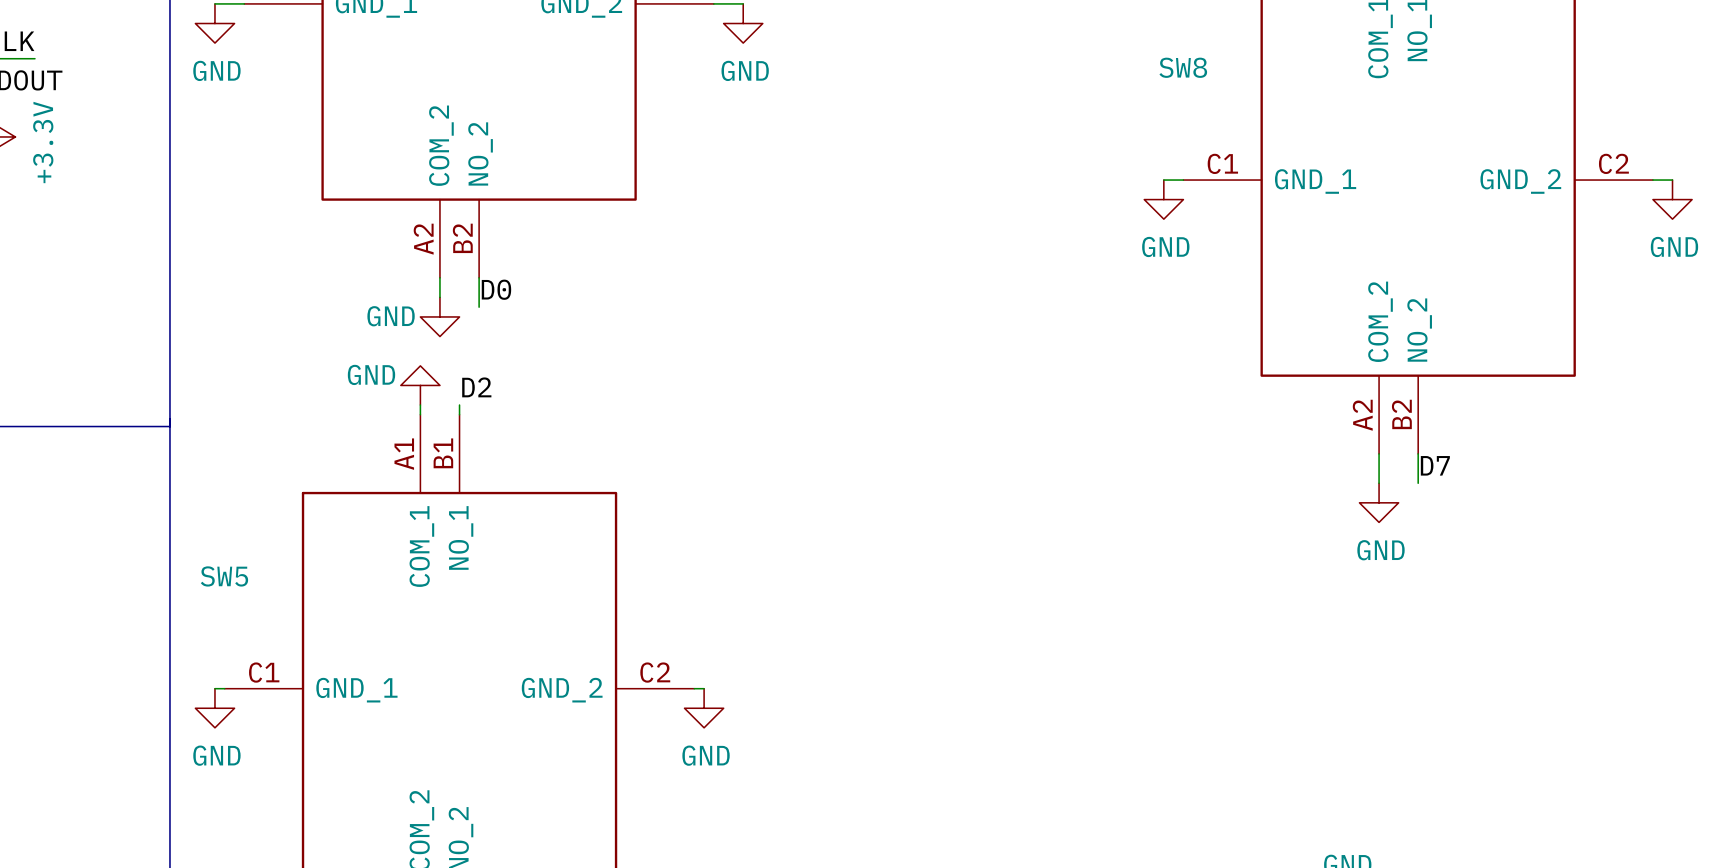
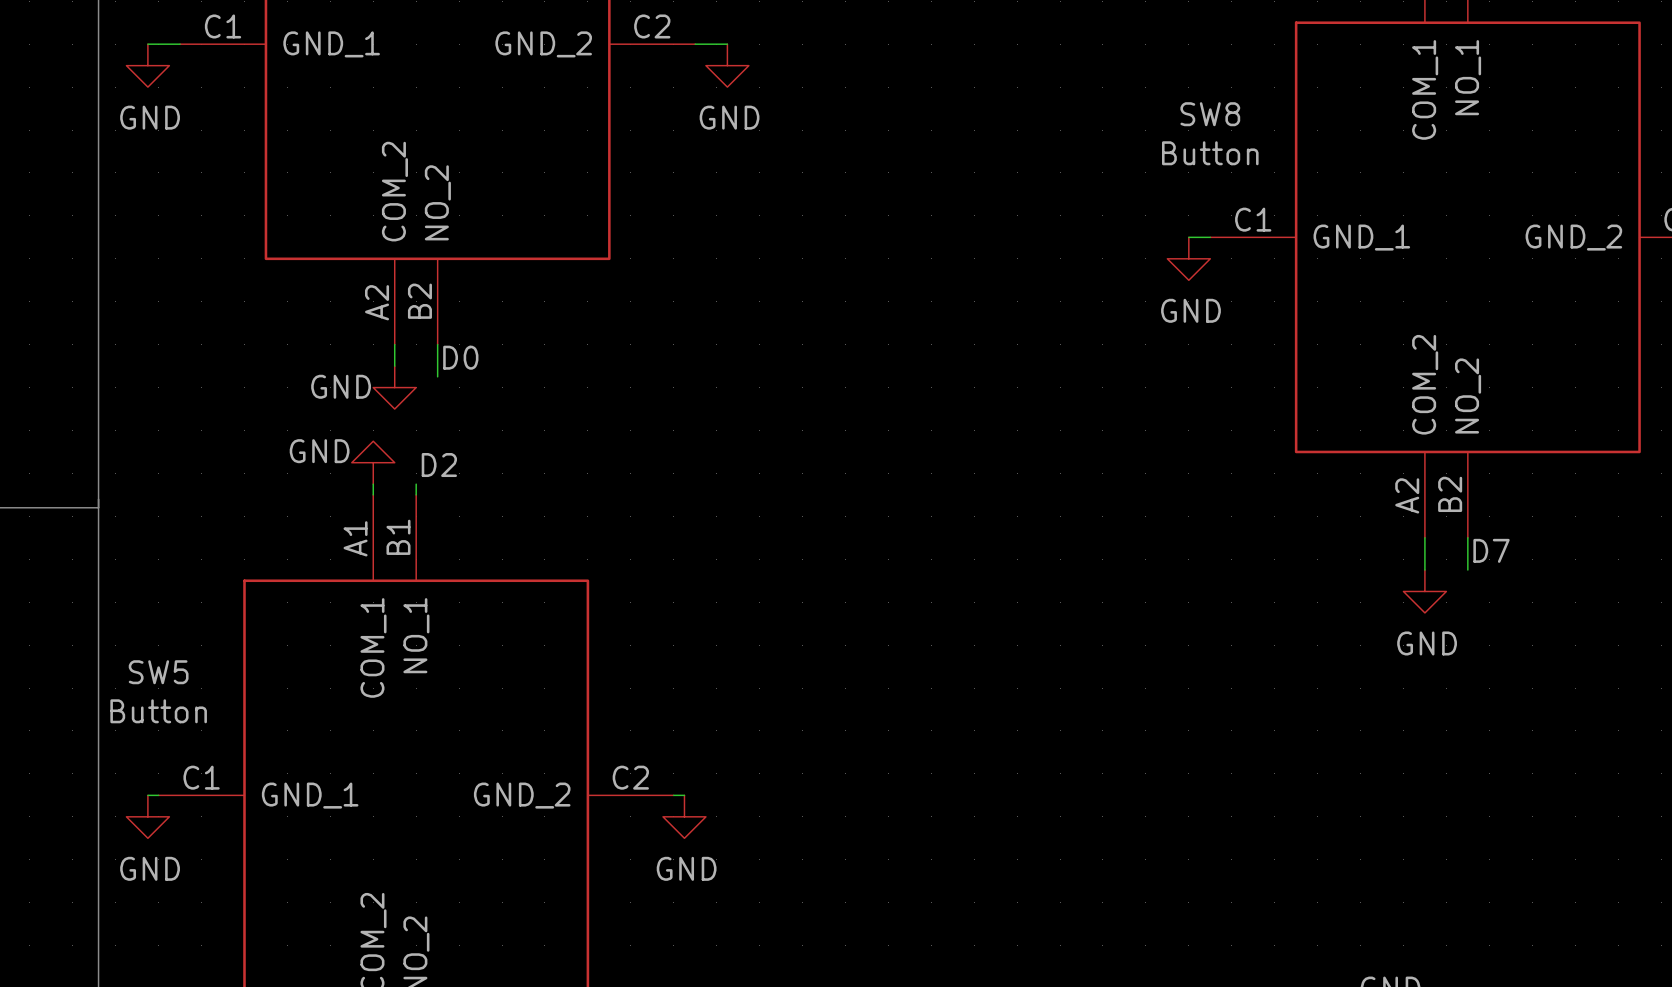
SW8 value: none -> Button (1210, 153)
SW5 value: none -> Button (158, 711)

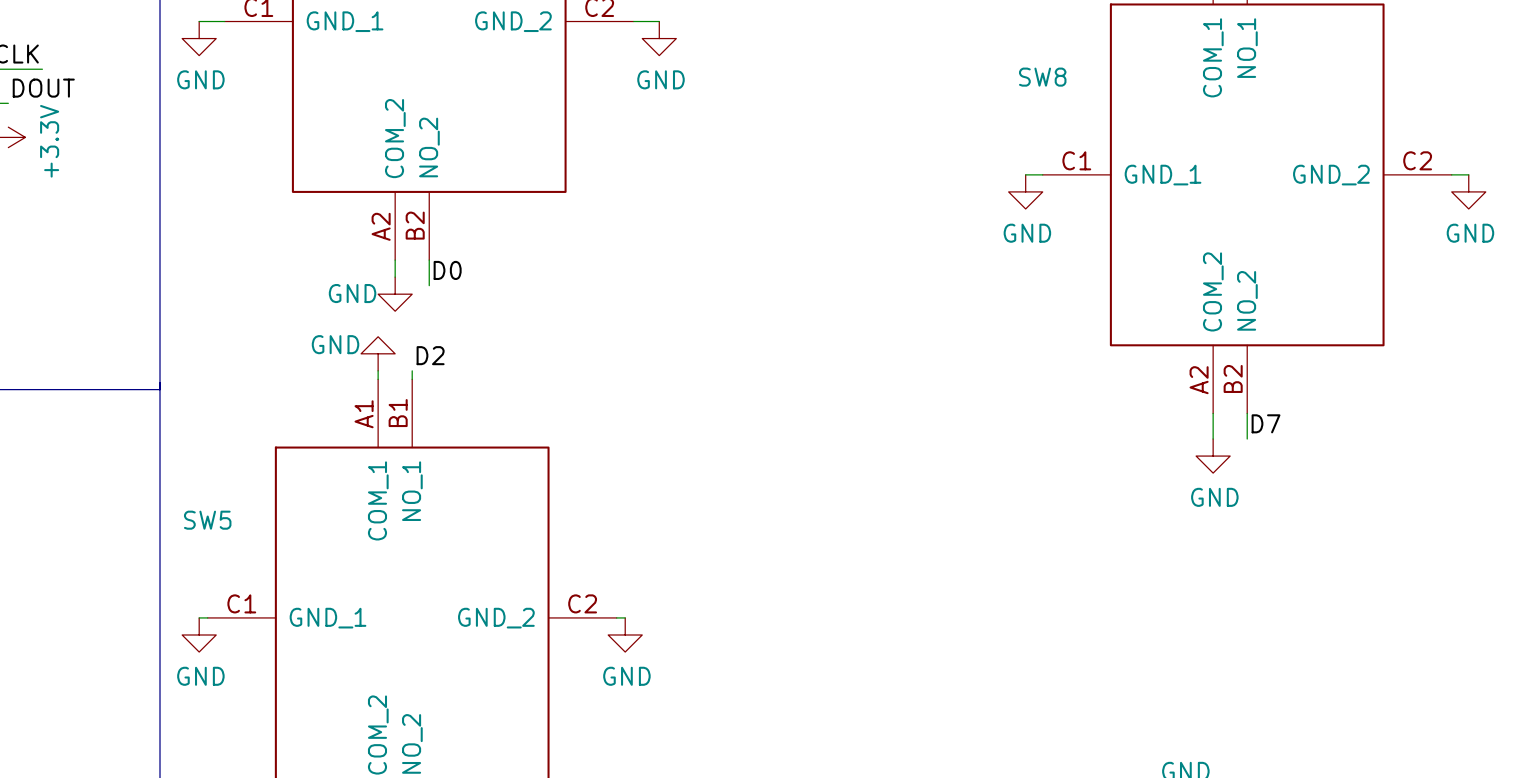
SW8 value: Button (1210, 153) -> none
SW5 value: Button (158, 711) -> none

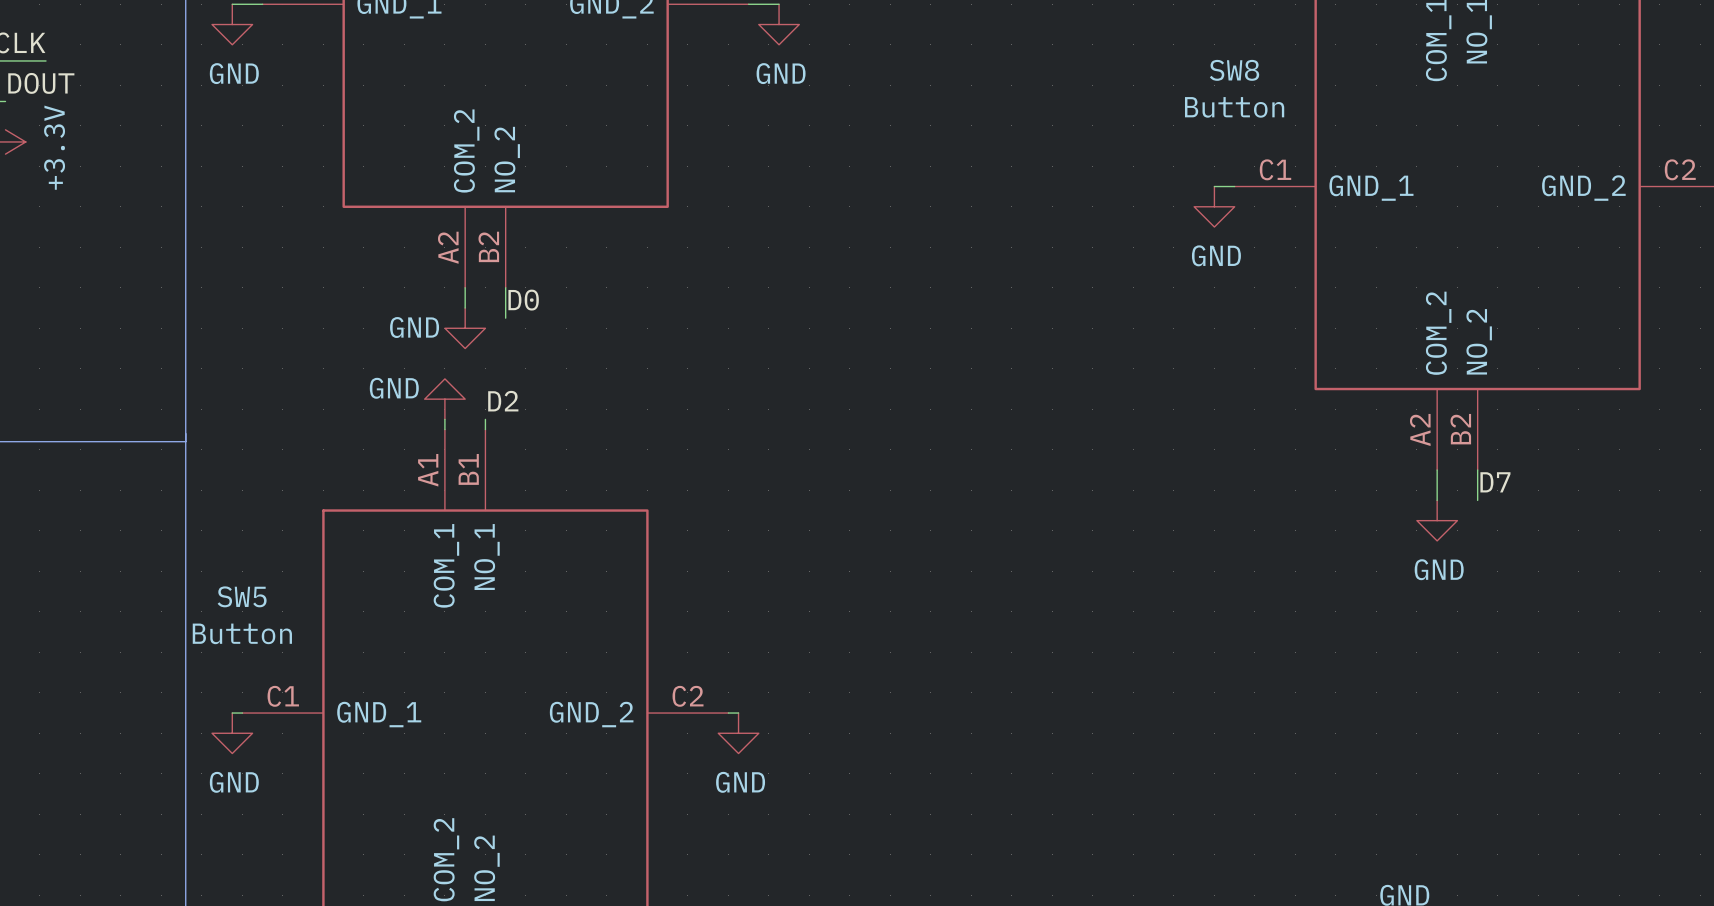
SW8 value: none -> Button (1234, 107)
SW5 value: none -> Button (242, 633)

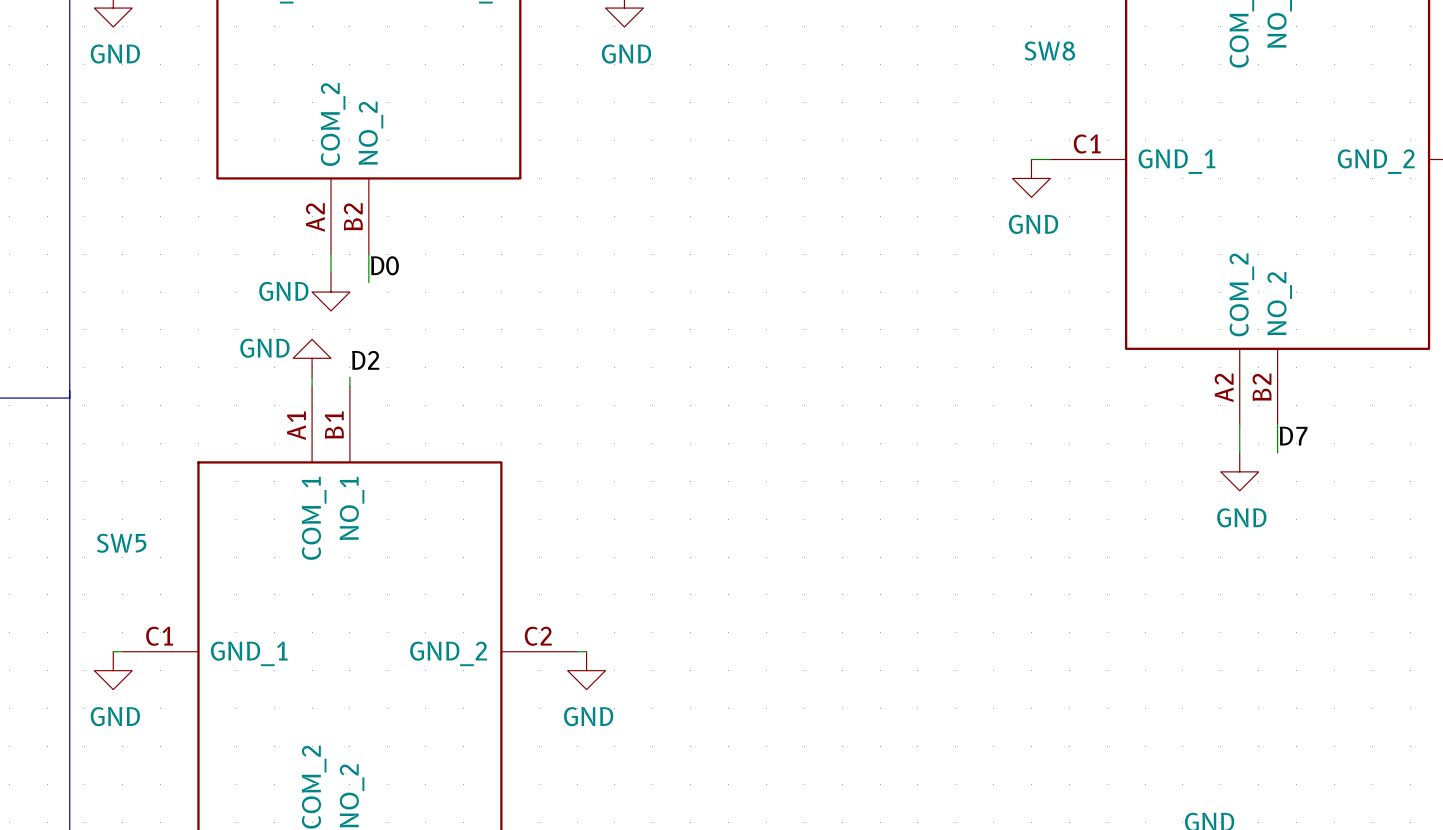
SW8 value: Button (1234, 107) -> none
SW5 value: Button (242, 633) -> none

